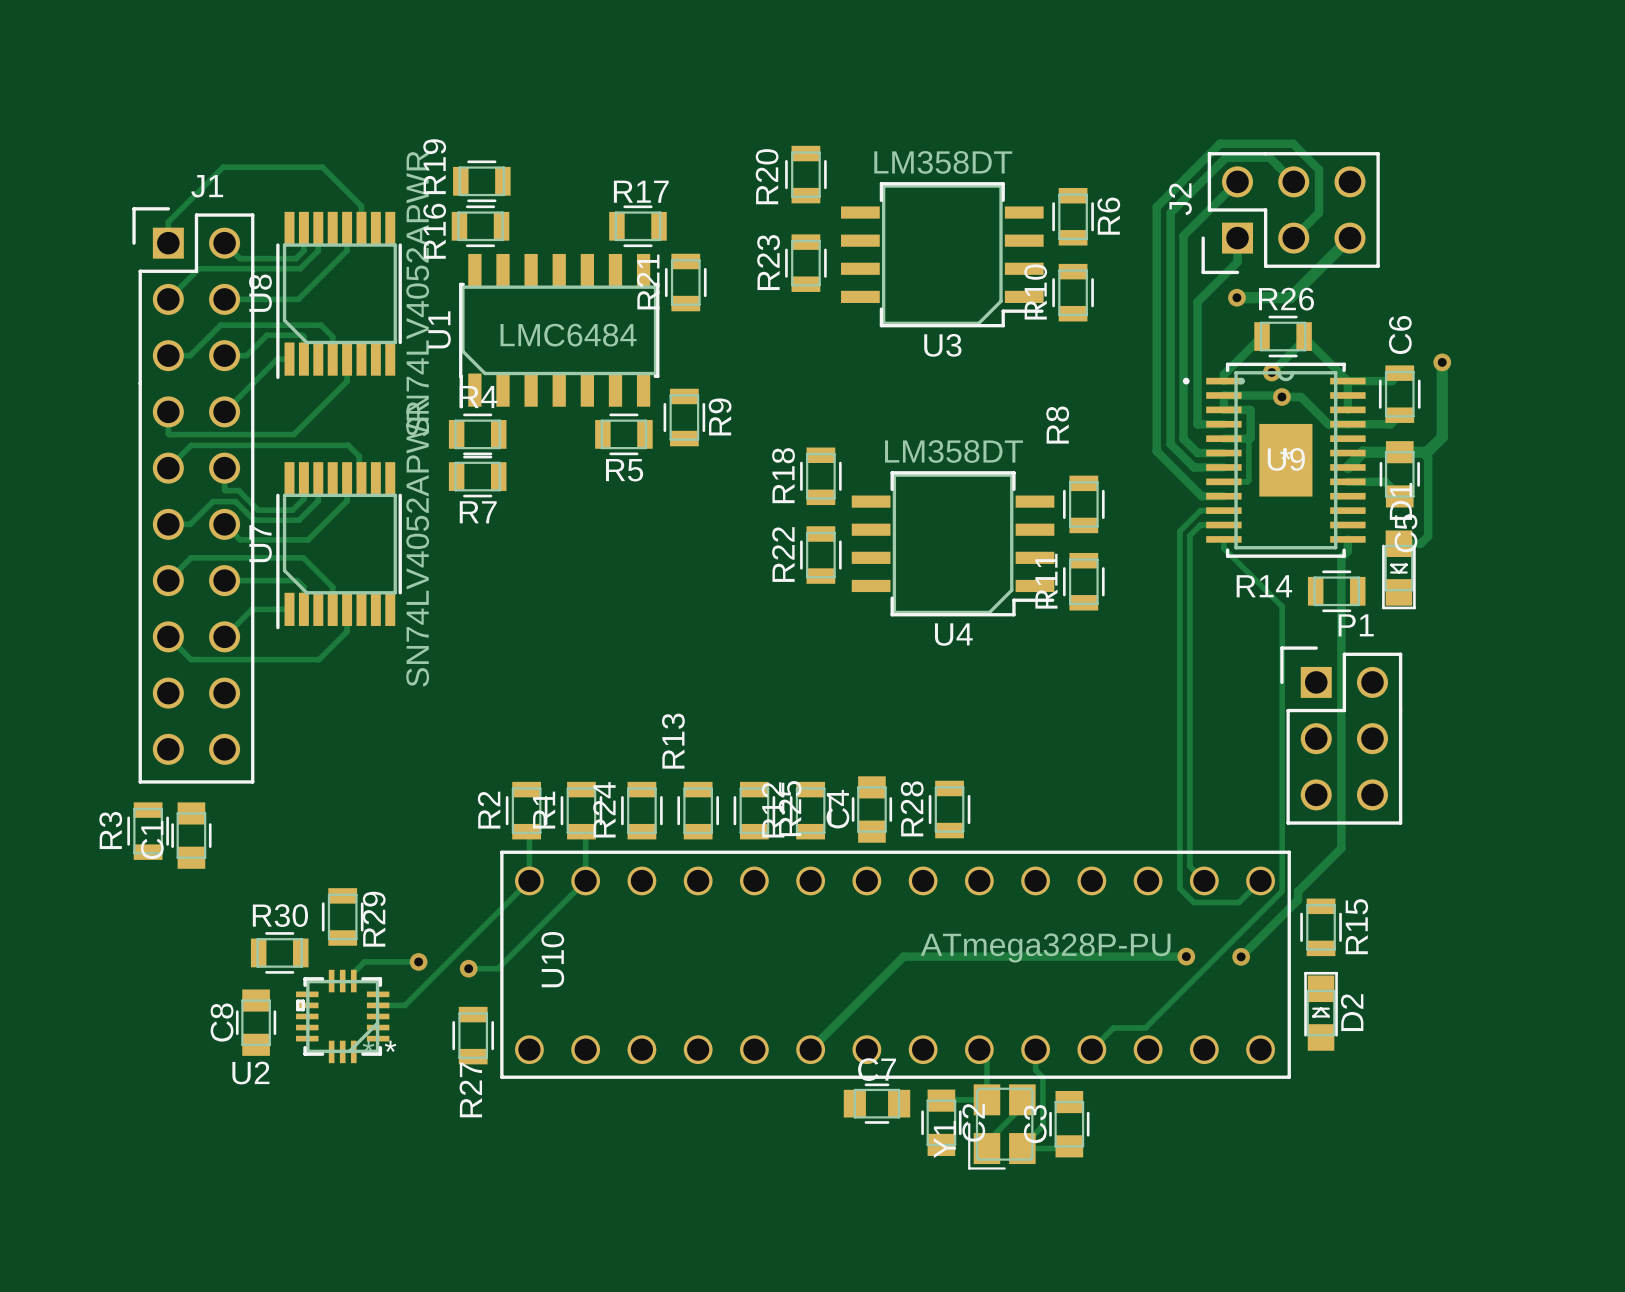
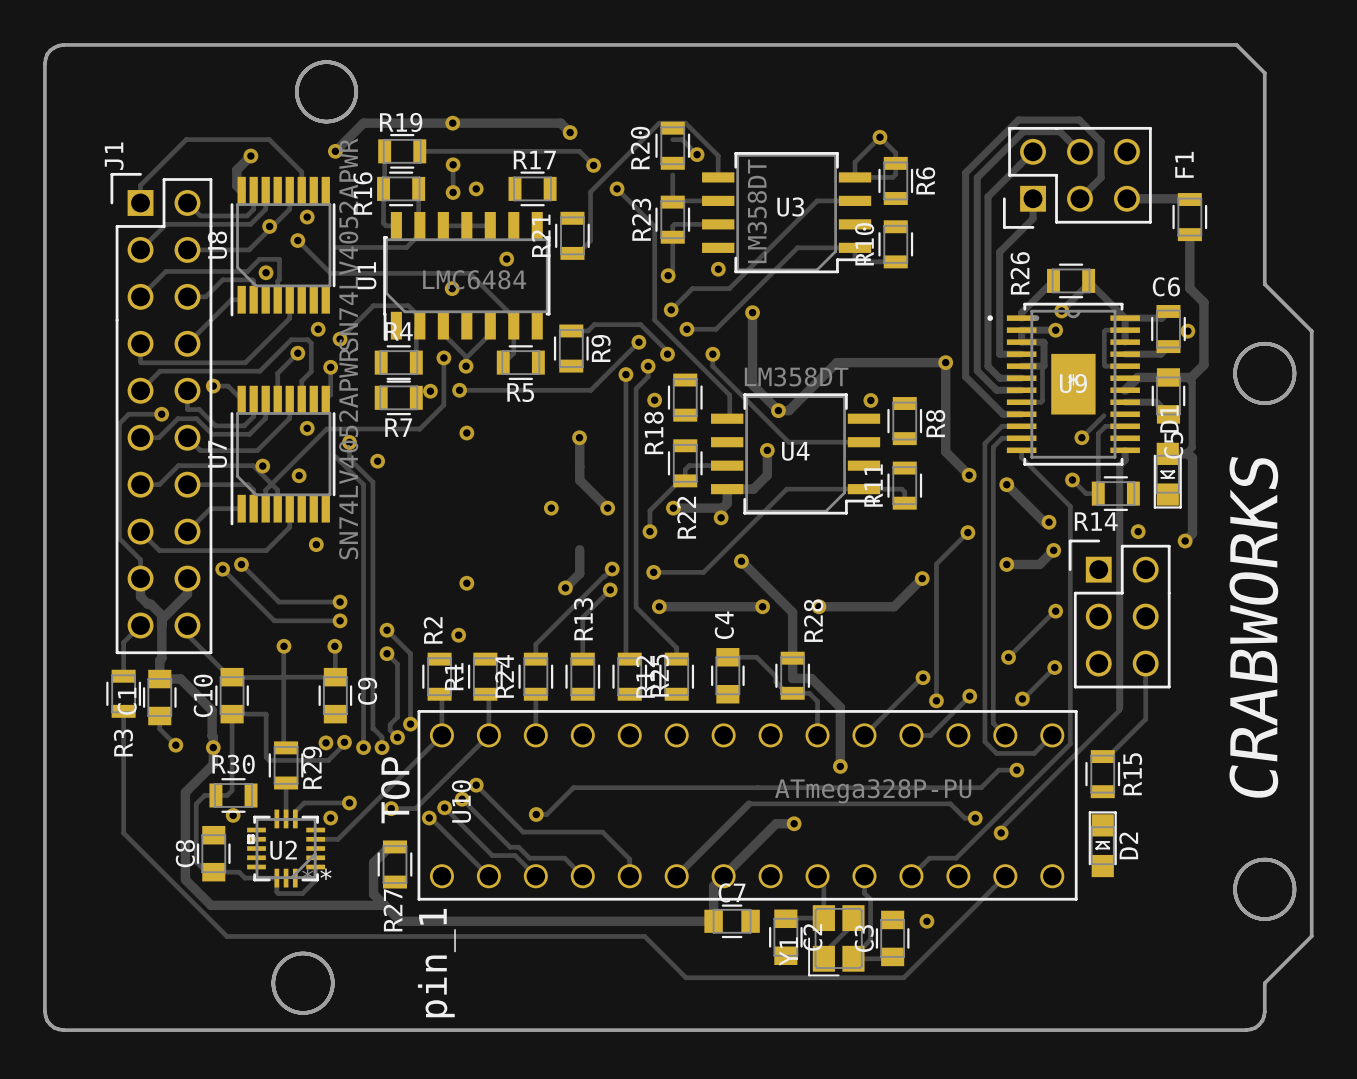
board edge: none -> (63, 44) (50, 50) (44, 63) (44, 1011) (50, 1024) (63, 1030) (1246, 1030) (1259, 1024) (1264, 1011) (1264, 983) (1311, 936) (1311, 331) (1264, 284) (1264, 73) (1236, 44) (63, 44)
board edge: none -> (323, 62) (312, 65) (303, 73) (298, 83) (297, 95) (300, 106) (308, 115) (318, 120) (329, 121) (340, 118) (349, 110) (354, 101) (356, 88) (352, 78) (344, 68) (334, 63) (323, 62)
via: none -> (452, 123)
track: none -> (570, 132) (560, 123) (363, 123) (335, 151)
via: none -> (570, 132)
U3 value rotation: 0° (943, 162) -> 90° counterclockwise (757, 211)
track: none -> (879, 137) (855, 162) (855, 177) (892, 177) (895, 174) (895, 153) (879, 137)
via: none -> (879, 137)
R19 name rotation: 0° (434, 166) -> 90° clockwise (401, 122)
track: none -> (672, 139) (682, 139) (697, 154)
via: none -> (335, 151)
track: none -> (384, 151) (383, 223) (386, 225) (396, 225)
track: none -> (419, 151) (579, 151) (593, 165)
via: none -> (697, 154)
J1 name rotation: 0° (207, 186) -> 90° counterclockwise (114, 156)
J1 name position: J1 (207, 186) -> J1 (114, 156)
track: none -> (250, 156) (236, 170) (236, 185) (241, 190)
via: none -> (250, 156)
track: none -> (453, 164) (453, 192)
via: none -> (453, 164)
via: none -> (593, 165)
J2 name: J2 (1180, 199) -> none
track: none -> (672, 174) (672, 202) (718, 200)
track: none -> (718, 177) (718, 155) (685, 123) (659, 123) (590, 191) (590, 240) (578, 253) (572, 253)
track: none -> (418, 188) (419, 234) (406, 247) (335, 247)
via: none -> (476, 188)
track: none -> (617, 188) (654, 226) (654, 320) (729, 395) (729, 416) (727, 418)
via: none -> (617, 188)
via: none -> (453, 192)
track: (1349, 238) (1290, 297) (1236, 297) -> (1126, 198) (1189, 199)
track: none -> (855, 200) (817, 200) (729, 288) (692, 288) (671, 309)
via: none -> (307, 217)
F1: none -> (1189, 217)
track: none -> (718, 224) (674, 224) (672, 226) (672, 271) (668, 275)
track: none -> (443, 225) (490, 225)
via: none -> (269, 226)
track: none -> (1189, 234) (1189, 288) (1203, 302)
track: none -> (297, 240) (330, 273) (469, 273) (513, 317) (513, 353) (503, 362)
via: none -> (297, 240)
via: (1236, 297) -> none
R26 name rotation: 0° (1286, 299) -> 90° counterclockwise (1020, 273)
via: none -> (506, 259)
track: none -> (895, 261) (859, 261) (855, 257) (855, 247) (797, 247) (716, 329) (686, 329)
via: none -> (718, 269)
track: (220, 325) (190, 355) (168, 355) -> (184, 271) (165, 271) (140, 296)
track: (296, 325) (321, 325) (332, 336) -> (247, 271) (259, 259) (279, 259) (279, 279) (277, 281)
via: none -> (266, 272)
via: none -> (668, 275)
C6 name rotation: 0° (1400, 335) -> 90° clockwise (1166, 286)
via: none -> (452, 288)
U3 name position: U3 (942, 345) -> U3 (790, 207)
via position: (1442, 362) -> (1187, 331)
via: none -> (671, 309)
track: none -> (752, 312) (752, 384) (778, 410) (788, 410) (836, 362) (945, 362) (945, 451) (969, 475)
via: none -> (752, 312)
track: none -> (443, 325) (443, 333) (466, 356) (466, 366)
track: none -> (490, 325) (490, 333) (466, 358)
via: none -> (318, 329)
via: none -> (686, 329)
track: (1264, 395) (1301, 396) (1328, 424) (1347, 424) -> none
track: none -> (1125, 330) (1104, 331) (1104, 365) (1125, 366)
track: none -> (571, 330) (588, 330) (594, 324) (640, 324) (667, 351) (667, 354)
via position: (1281, 396) -> (1055, 330)
track: none -> (340, 339) (373, 305) (408, 305) (419, 317) (419, 325) (416, 329) (416, 362)
via: none -> (340, 339)
track: none -> (638, 342) (590, 390) (459, 390)
via: none -> (638, 342)
board edge: none -> (1263, 343) (1251, 347) (1242, 353) (1236, 363) (1235, 375) (1238, 386) (1245, 396) (1255, 401) (1266, 403) (1277, 400) (1286, 393) (1292, 383) (1294, 371) (1291, 360) (1284, 350) (1274, 345) (1263, 343)
track: none -> (297, 353) (277, 373) (277, 399)
via: none -> (297, 353)
via: none -> (667, 354)
track: none -> (712, 354) (712, 366) (788, 442) (863, 442)
via: none -> (712, 354)
R8 name position: R8 (1057, 425) -> R8 (935, 423)
track: none -> (443, 357) (443, 404)
via: none -> (443, 357)
via: none -> (945, 362)
via: none -> (466, 366)
track: none -> (648, 366) (648, 376) (636, 388) (636, 607) (676, 647) (676, 659)
via: none -> (648, 366)
track: none -> (330, 367) (330, 394) (325, 399)
via: none -> (330, 367)
track: (191, 445) (348, 445) (359, 456) (359, 476) (361, 478) -> (159, 371) (259, 371) (291, 339) (307, 339) (311, 343) (311, 371) (301, 381) (301, 399)
track: none -> (625, 374) (625, 655) (629, 659)
via: none -> (625, 374)
track: none -> (213, 386) (228, 386) (241, 399)
via: none -> (213, 386)
via: none -> (459, 390)
via: none -> (430, 391)
R18 name position: R18 (783, 475) -> R18 (654, 432)
via: none -> (654, 400)
via: none -> (870, 400)
track: none -> (443, 405) (419, 429)
via: none -> (778, 410)
track: none -> (161, 414) (128, 414) (119, 423) (119, 538) (140, 559) (140, 596) (161, 615) (159, 679)
via: none -> (161, 414)
track: none -> (1104, 415) (1081, 437)
track: none -> (1125, 426) (1105, 426) (1098, 433) (1098, 493) (1086, 493) (1072, 479)
via: none -> (307, 428)
track: none -> (419, 428) (326, 428) (265, 490) (265, 508)
via: none -> (466, 433)
track: none -> (579, 437) (579, 480) (607, 508)
via: none -> (579, 437)
via: none -> (1081, 437)
track: none -> (349, 442) (349, 458) (372, 482) (372, 728) (382, 737) (382, 747)
via: none -> (349, 442)
track: none -> (767, 450) (767, 475) (753, 489) (727, 489) (727, 503) (722, 508) (673, 508)
via: none -> (767, 450)
track: none -> (1167, 453) (1188, 453) (1192, 458) (1192, 533) (1185, 541)
track: none -> (335, 456) (363, 484) (363, 747)
via: none -> (377, 461)
R22 name position: R22 (783, 554) -> R22 (686, 517)
track: (213, 557) (191, 557) (168, 580) -> (178, 465) (159, 484) (140, 484)
track: none -> (727, 465) (689, 465) (685, 469) (685, 480) (679, 480) (649, 510) (649, 531)
via: none -> (262, 466)
via: none -> (299, 475)
via: none -> (969, 475)
via: none -> (1072, 479)
track: none -> (1006, 484) (1044, 522) (1048, 522)
via: none -> (1006, 484)
R14 name position: R14 (1264, 586) -> R14 (1096, 521)
track: none -> (904, 503) (904, 492) (901, 489) (786, 489) (703, 572) (653, 572)
via: none -> (551, 508)
via: none -> (607, 508)
via: none -> (673, 508)
via: none -> (721, 517)
via: none -> (1048, 522)
P1 name: P1 (1356, 625) -> none
U4 name position: U4 (953, 634) -> U4 (795, 451)
via: none -> (649, 531)
via: none -> (1138, 531)
track: none -> (967, 532) (936, 564) (936, 700)
via: none -> (967, 532)
via: none -> (1185, 541)
via: none -> (316, 544)
track: none -> (579, 549) (579, 573) (565, 587)
track: none -> (1053, 550) (1039, 564) (1006, 564)
via: none -> (1053, 550)
track: none -> (741, 561) (792, 612) (792, 678) (811, 678) (840, 707) (840, 766)
via: none -> (741, 561)
track: none -> (241, 564) (279, 602) (340, 602)
via: none -> (241, 564)
via: none -> (1006, 564)
track: none -> (222, 569) (274, 620) (340, 620)
via: none -> (222, 569)
track: none -> (612, 569) (535, 644) (535, 659)
via: none -> (612, 569)
via: none -> (653, 572)
track: none -> (187, 578) (187, 593) (161, 619)
track: none -> (922, 578) (894, 606) (818, 606)
via: none -> (922, 578)
via: none -> (466, 583)
via: none -> (565, 587)
track: none -> (610, 589) (582, 617) (582, 659)
via: none -> (610, 589)
via: none -> (340, 602)
track: none -> (659, 606) (762, 606)
via: none -> (659, 606)
via: none -> (762, 606)
via: none -> (818, 606)
track: none -> (1055, 611) (1008, 657)
via: none -> (1055, 611)
R13 name position: R13 (673, 741) -> R13 (583, 619)
via: none -> (340, 620)
track: none -> (140, 625) (123, 642) (123, 676)
track: none -> (187, 625) (187, 634) (229, 677) (335, 677) (334, 646)
text: none -> CRABWORKS (1253, 627)
track: none -> (387, 630) (410, 653) (410, 724)
via: none -> (387, 630)
via: none -> (458, 635)
track: none -> (283, 646) (283, 745) (286, 747)
via: none -> (283, 646)
via: none -> (334, 646)
track: none -> (387, 653) (397, 664) (397, 717) (390, 724) (390, 730) (397, 737)
via: none -> (387, 653)
track: none -> (727, 657) (756, 657) (775, 676) (775, 682) (787, 693) (809, 693) (817, 701) (817, 735)
via: none -> (1008, 657)
track: none -> (1145, 663) (1145, 719) (1108, 756) (1102, 756)
track: none -> (1054, 667) (1022, 698)
via: none -> (1054, 667)
R28 name position: R28 (912, 808) -> R28 (813, 620)
C4 name position: C4 (837, 809) -> C4 (724, 625)
R2 name position: R2 (489, 810) -> R2 (433, 630)
track: none -> (923, 677) (864, 735)
via: none -> (923, 677)
track: none -> (159, 679) (180, 679) (212, 710) (213, 764) (185, 792) (185, 879) (211, 905) (384, 905)
R3 name position: R3 (110, 830) -> R3 (123, 742)
track: none -> (535, 694) (535, 735)
C10: none -> (232, 695)
C9: none -> (335, 695)
track: none -> (969, 696) (930, 735) (911, 735)
via: none -> (969, 696)
via: none -> (1022, 698)
via: none -> (936, 700)
track: (1341, 848) (1297, 891) (1297, 900) (1241, 956) -> (1119, 708) (1001, 828) (1001, 832)
track: none -> (123, 711) (123, 833) (227, 936) (644, 936) (686, 977) (903, 977) (1005, 876)
track: none -> (159, 716) (159, 729) (175, 745)
via: none -> (410, 724)
via: none -> (397, 737)
via: none -> (325, 742)
track: none -> (344, 742) (328, 760) (269, 760) (266, 757) (266, 714) (232, 714) (232, 790) (227, 795) (204, 795) (196, 804) (196, 861) (206, 872) (239, 872) (244, 878) (276, 878) (278, 893) (302, 893) (315, 880) (315, 867)
via: none -> (344, 742)
via: none -> (175, 745)
via: none -> (213, 747)
via: none -> (363, 747)
via: none -> (382, 747)
via: none -> (840, 766)
track: none -> (1016, 770) (998, 770) (981, 787) (573, 787) (546, 814) (536, 814)
via: none -> (1016, 770)
track: none -> (286, 782) (286, 818)
track: none -> (476, 785) (523, 832) (602, 832) (629, 859) (629, 876)
via: none -> (476, 785)
text: none -> TOP (395, 790)
track: (1186, 956) (903, 956) (897, 962) -> (975, 818) (964, 818) (950, 803) (749, 803)
via: (1186, 956) -> none
via: (1241, 956) -> none
track: none -> (462, 799) (510, 847) (518, 847) (529, 858) (564, 858) (582, 876)
via: none -> (462, 799)
track: none -> (444, 807) (492, 855) (515, 855) (535, 876)
via: none -> (444, 807)
via: none -> (536, 814)
via: none -> (233, 815)
via: none -> (330, 818)
track: none -> (429, 818) (488, 876)
via: none -> (429, 818)
via: none -> (975, 818)
track: none -> (794, 823) (776, 823) (713, 886) (713, 921)
via: none -> (794, 823)
via: none -> (1001, 832)
track: none -> (395, 846) (389, 846) (373, 862) (373, 894) (400, 921) (713, 921)
board edge: none -> (1263, 859) (1251, 862) (1242, 869) (1236, 879) (1235, 891) (1238, 903) (1245, 912) (1255, 917) (1266, 918) (1277, 916) (1286, 909) (1292, 899) (1294, 887) (1291, 876) (1284, 866) (1274, 861) (1263, 859)
U2 name position: U2 (250, 1073) -> U2 (283, 850)
via: none -> (926, 921)
board edge: none -> (300, 953) (288, 957) (279, 964) (274, 974) (273, 986) (276, 997) (284, 1006) (294, 1011) (306, 1012) (317, 1009) (325, 1002) (331, 992) (332, 980) (329, 969) (321, 959) (311, 954) (300, 953)
text: none -> pin_1 (436, 963)

